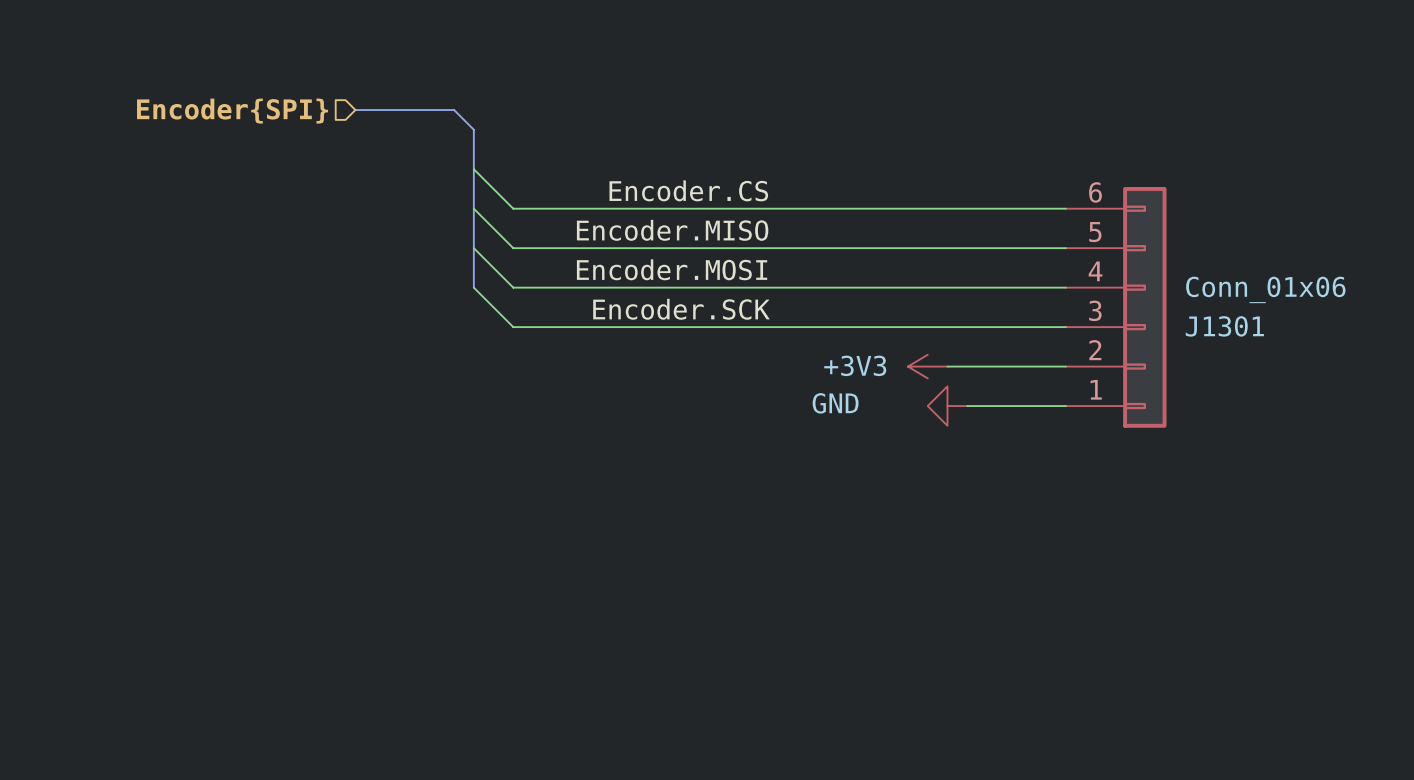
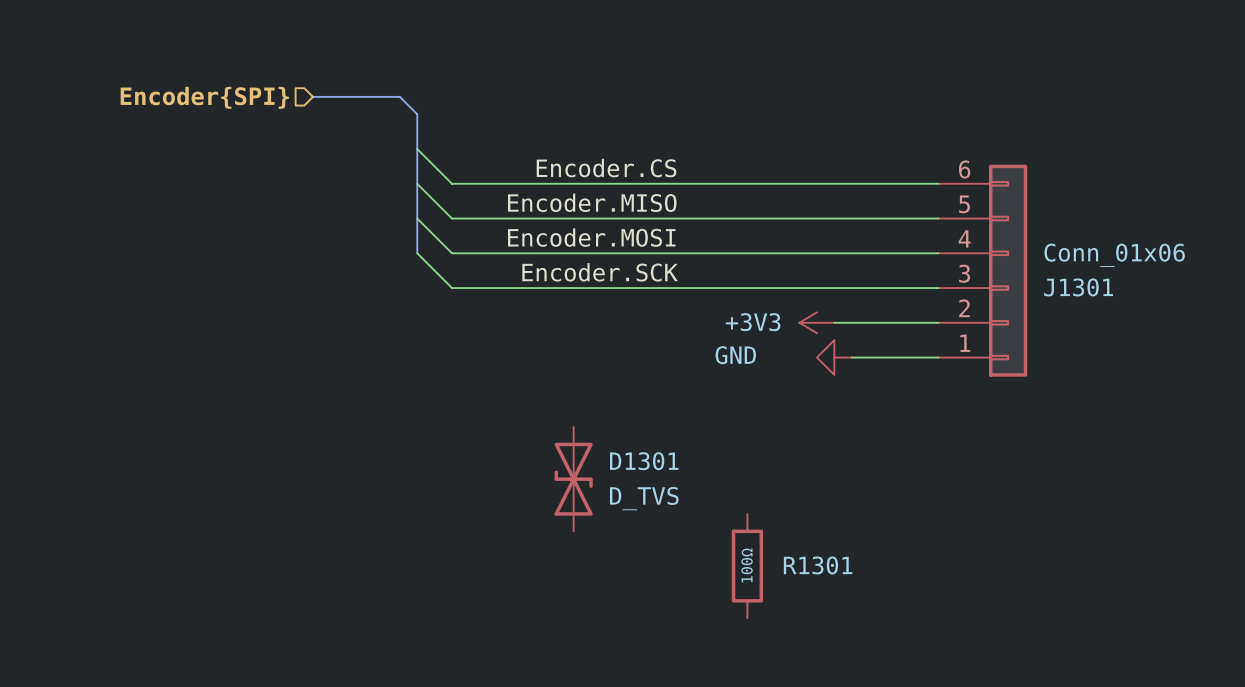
D1301: none -> D_TVS (573, 479)
R1301: none -> 100Ω (747, 566)

